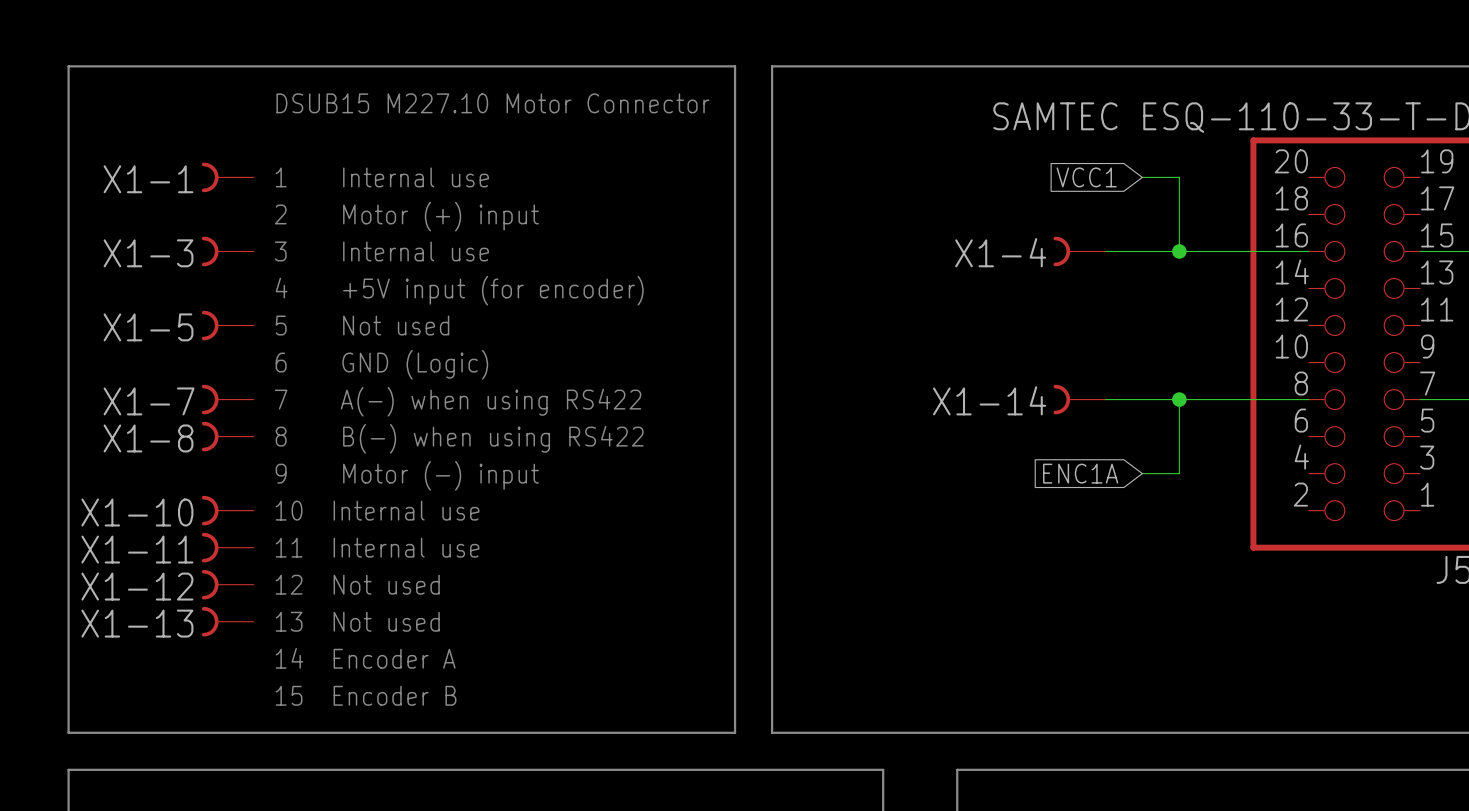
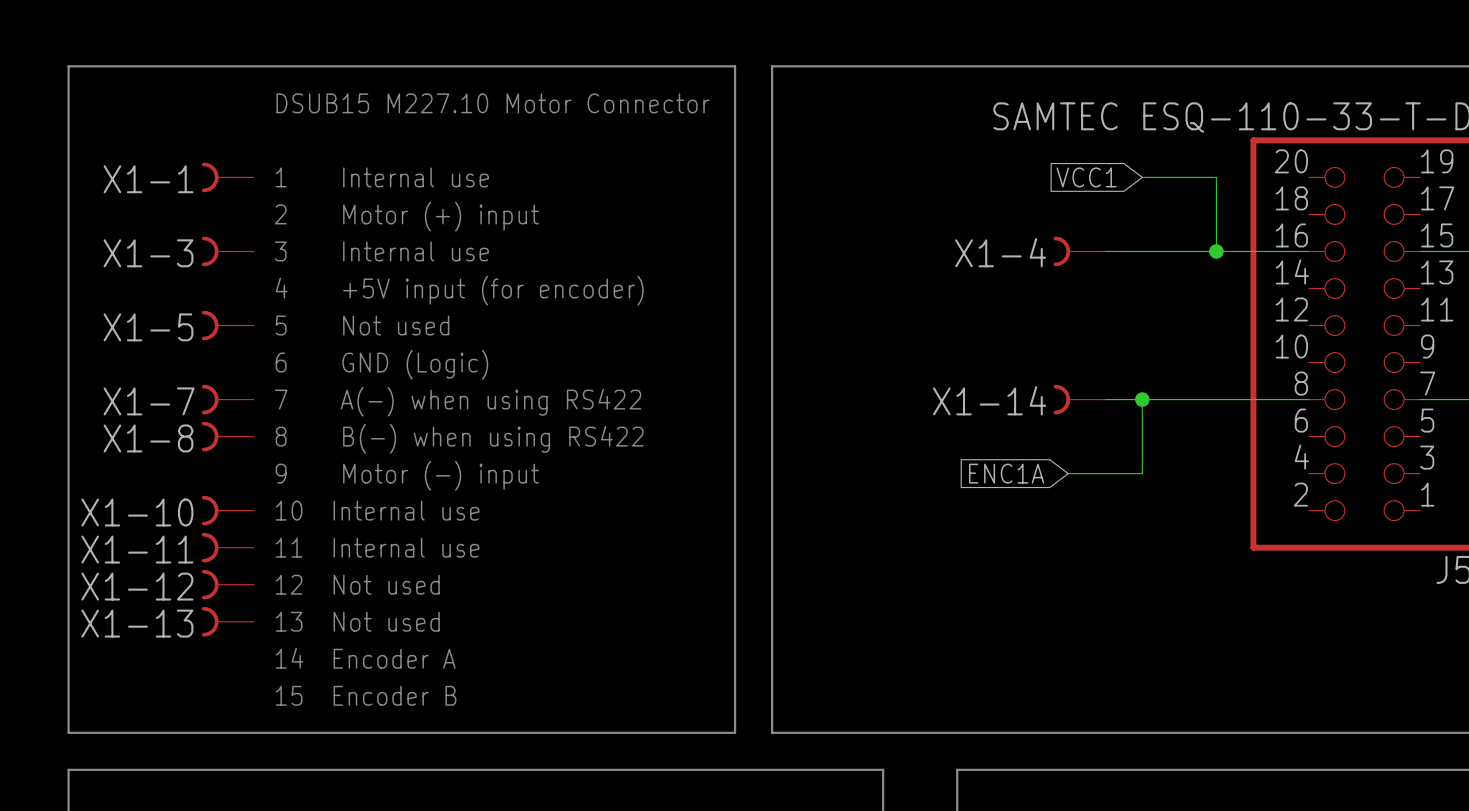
wire: (1179, 177) (1179, 251) -> (1179, 177) (1216, 177) (1216, 251)
junction position: (1179, 251) -> (1216, 251)
wire: none -> (1142, 399) (1142, 473) (1068, 473)
wire: (1179, 399) (1179, 473) (1142, 473) -> none
junction position: (1179, 399) -> (1142, 399)
global label position: ENC1A (1080, 473) -> ENC1A (1006, 473)

